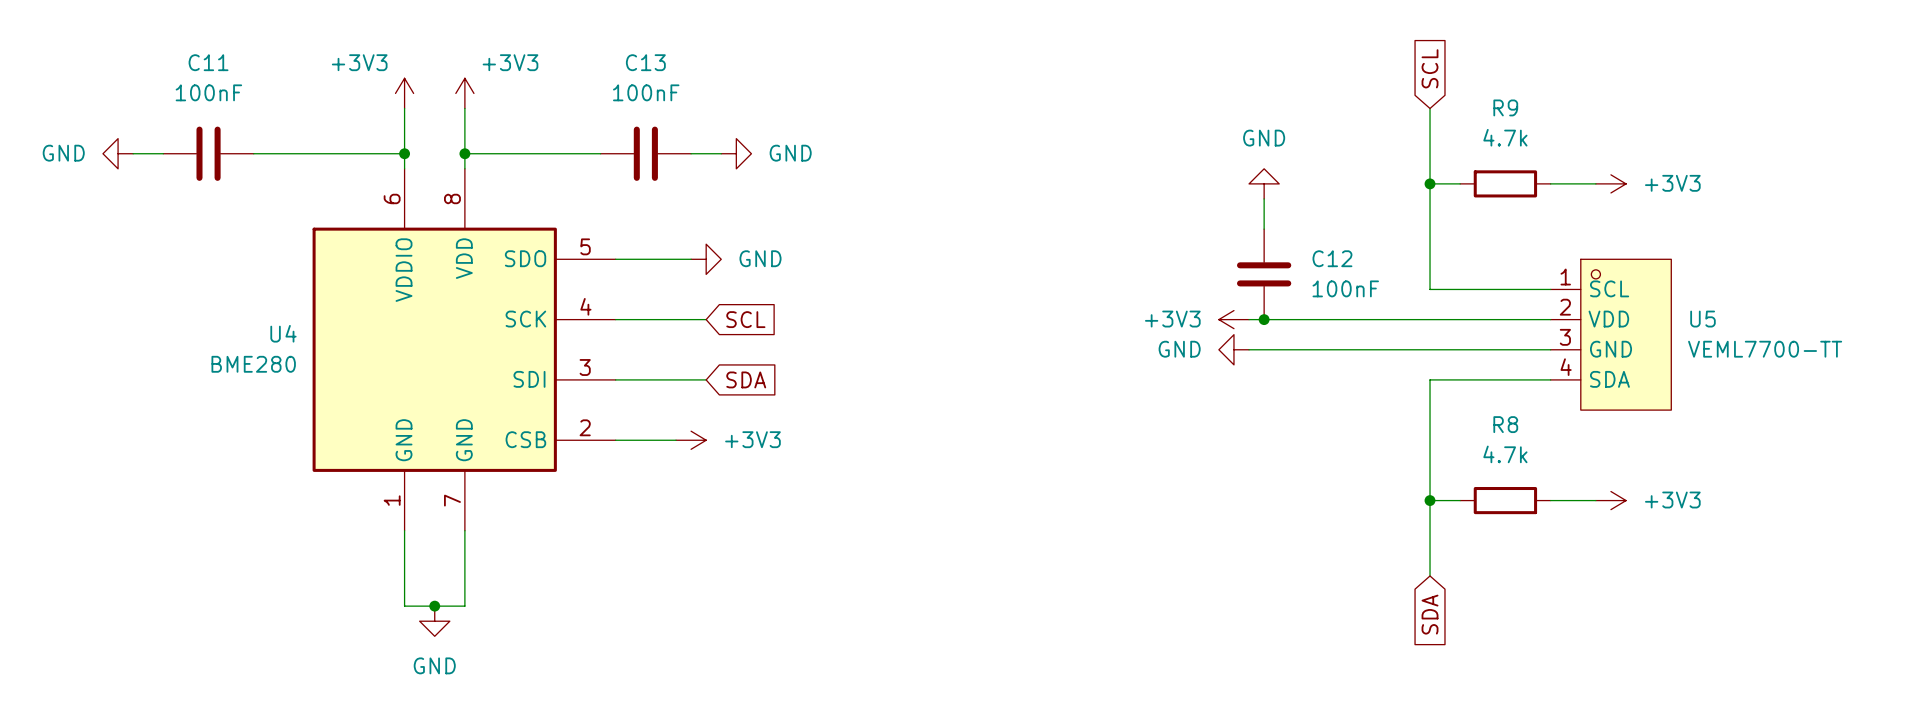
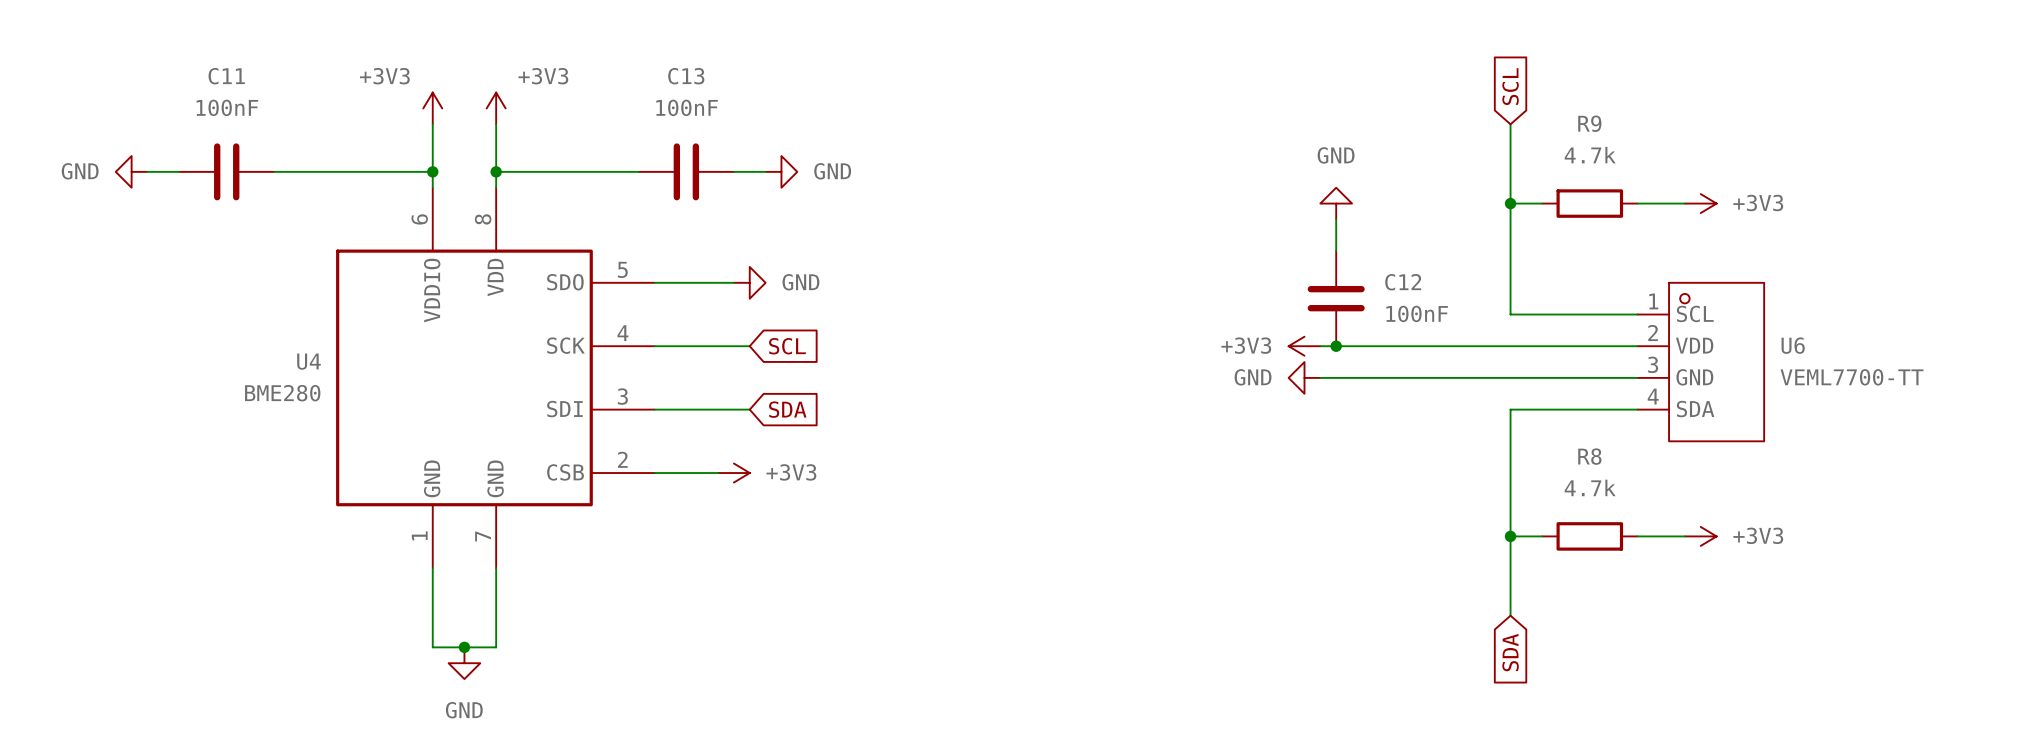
U5 name: U5 (1702, 319) -> U6 (1793, 345)

